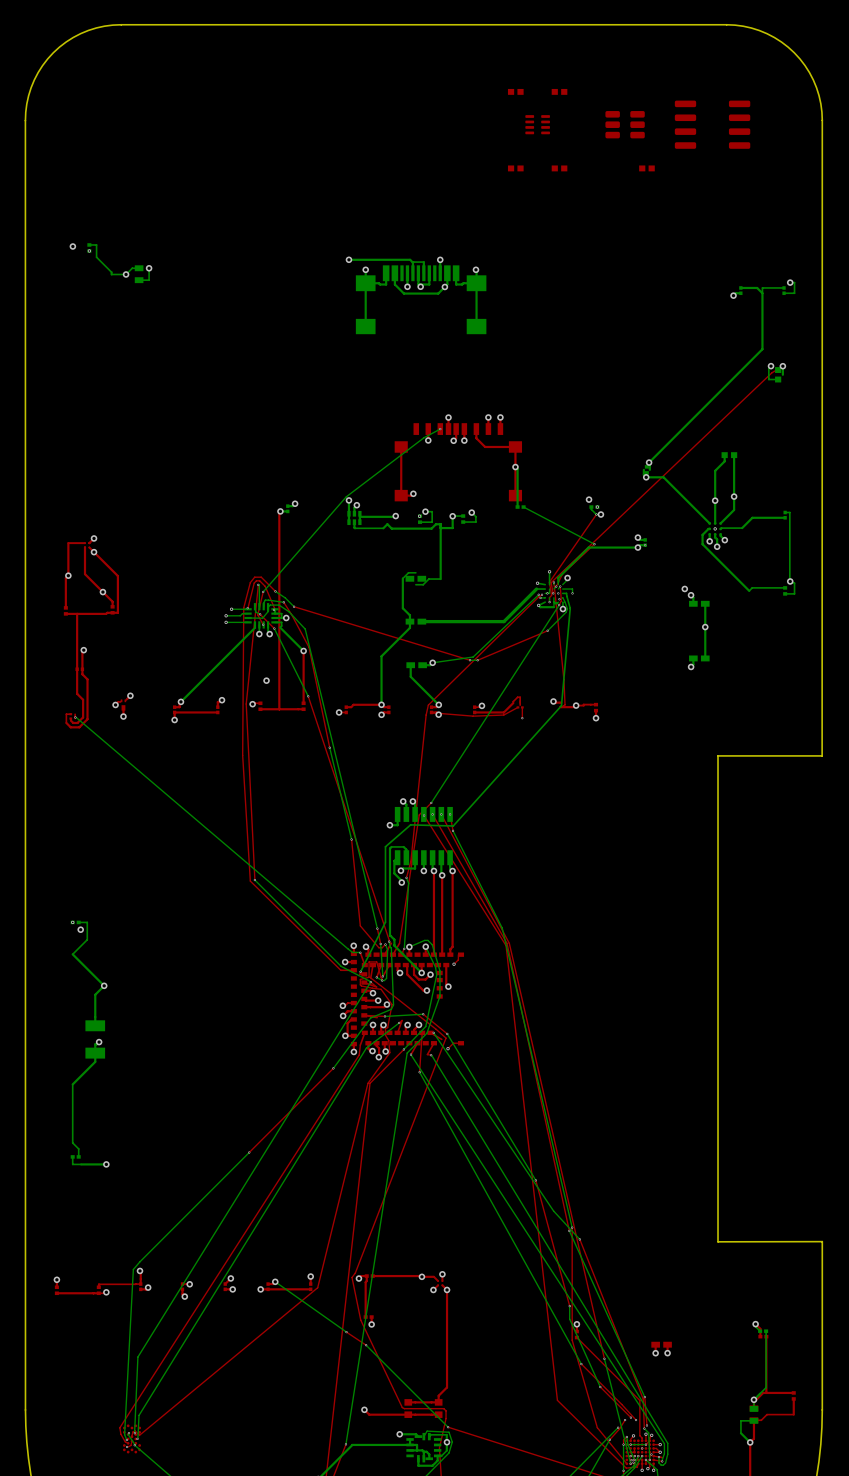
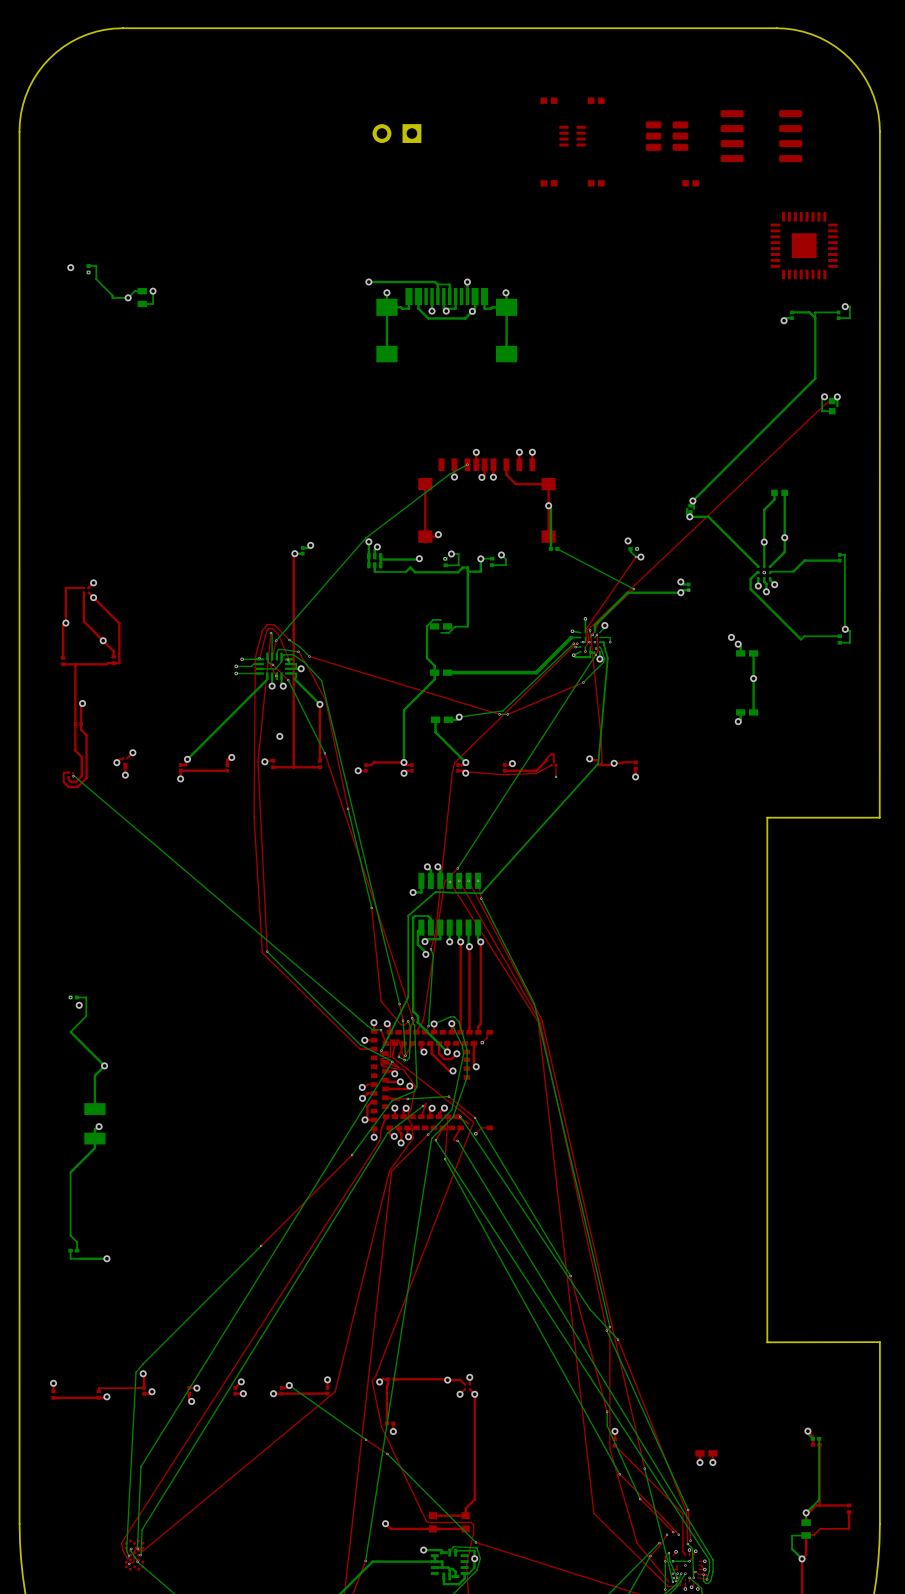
part: none -> (396, 133)
part: none -> (804, 245)
part: (640, 1452) -> none

